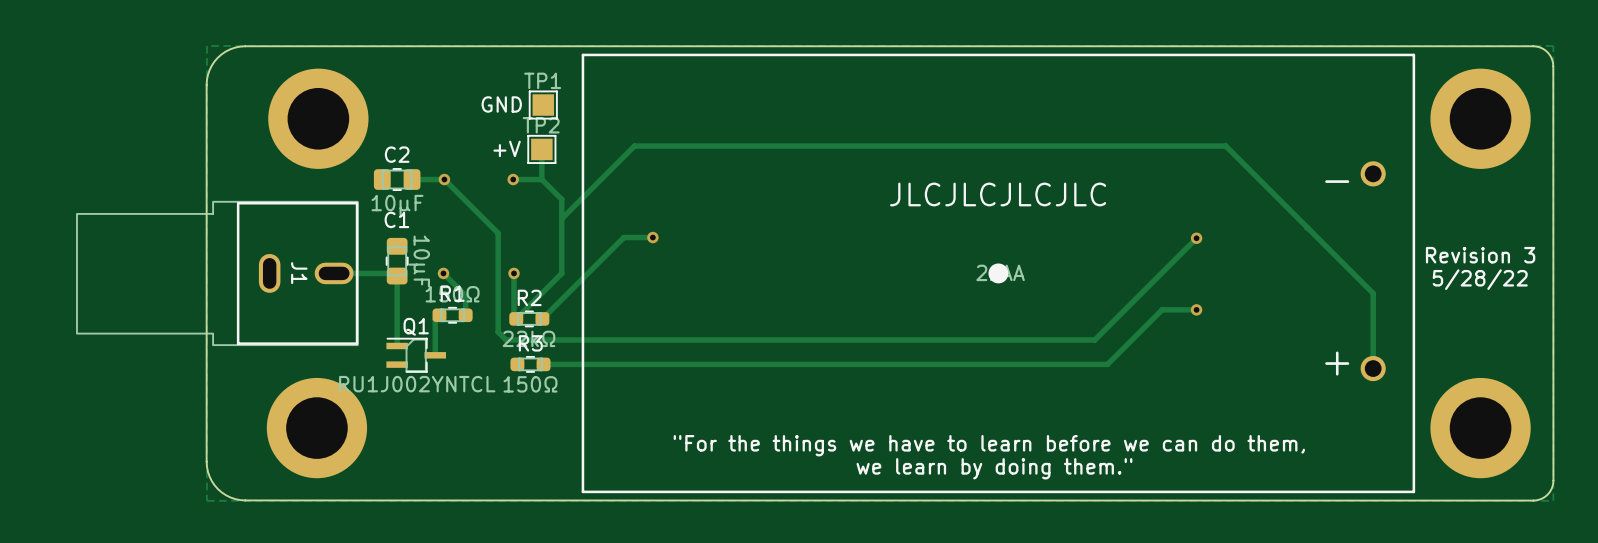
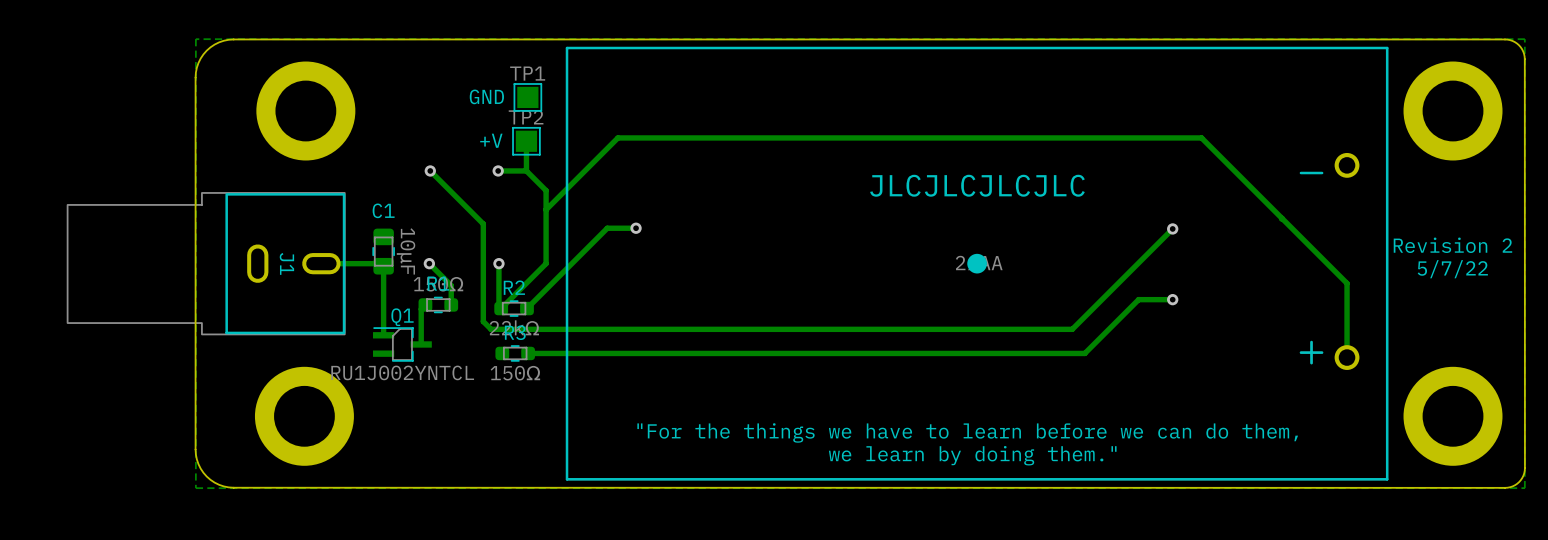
C2: 10μF (397, 179) -> none
track: (444, 179) (412, 179) -> none
text: Revision 3 (1480, 255) -> Revision 2 (1452, 245)
text: 5/28/22 (1480, 279) -> 5/7/22 (1452, 269)

